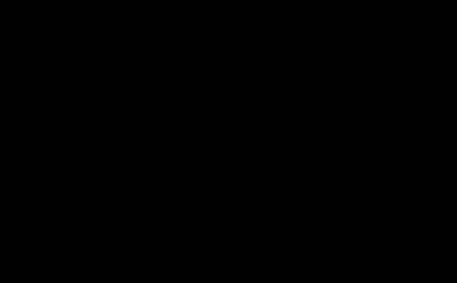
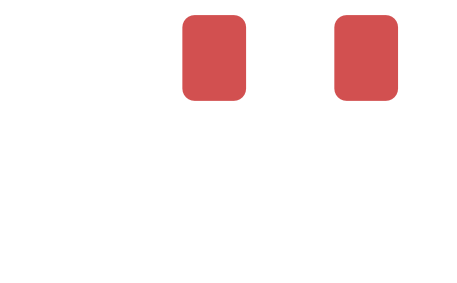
part: none -> (290, 57)

